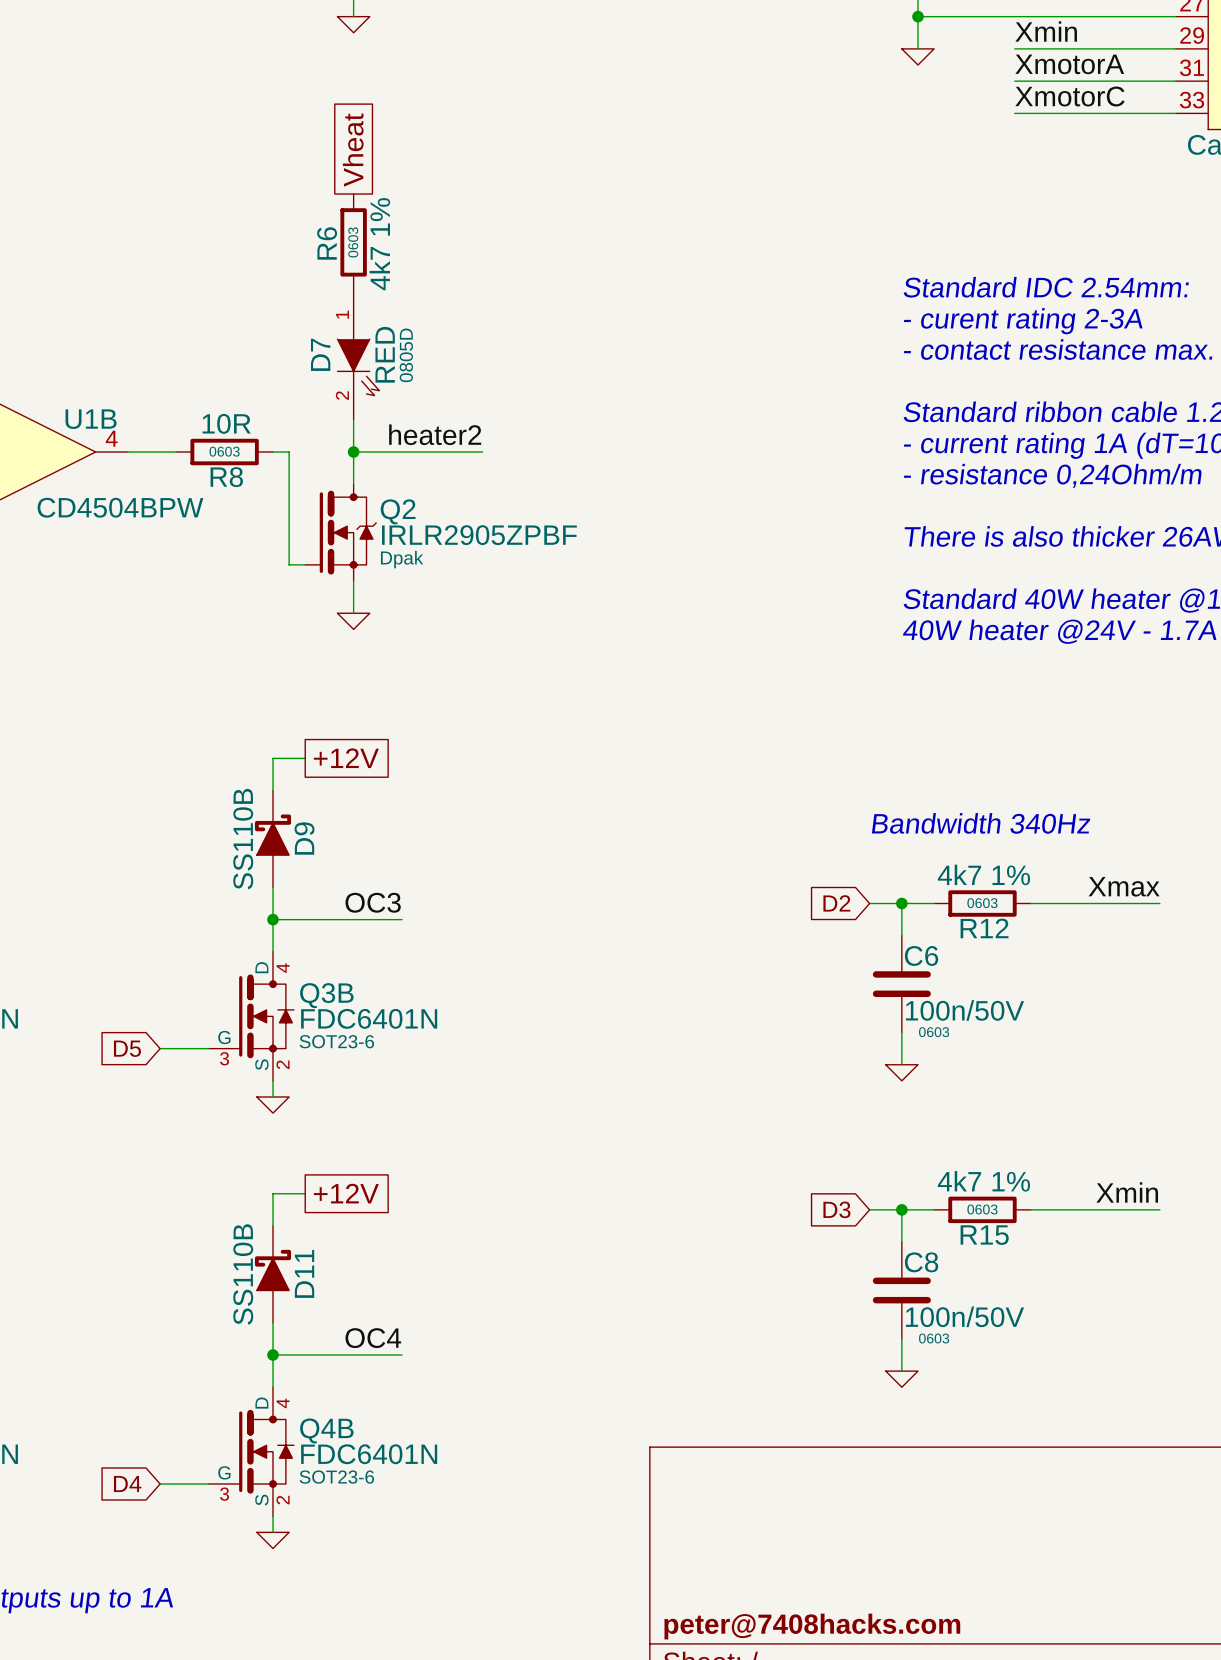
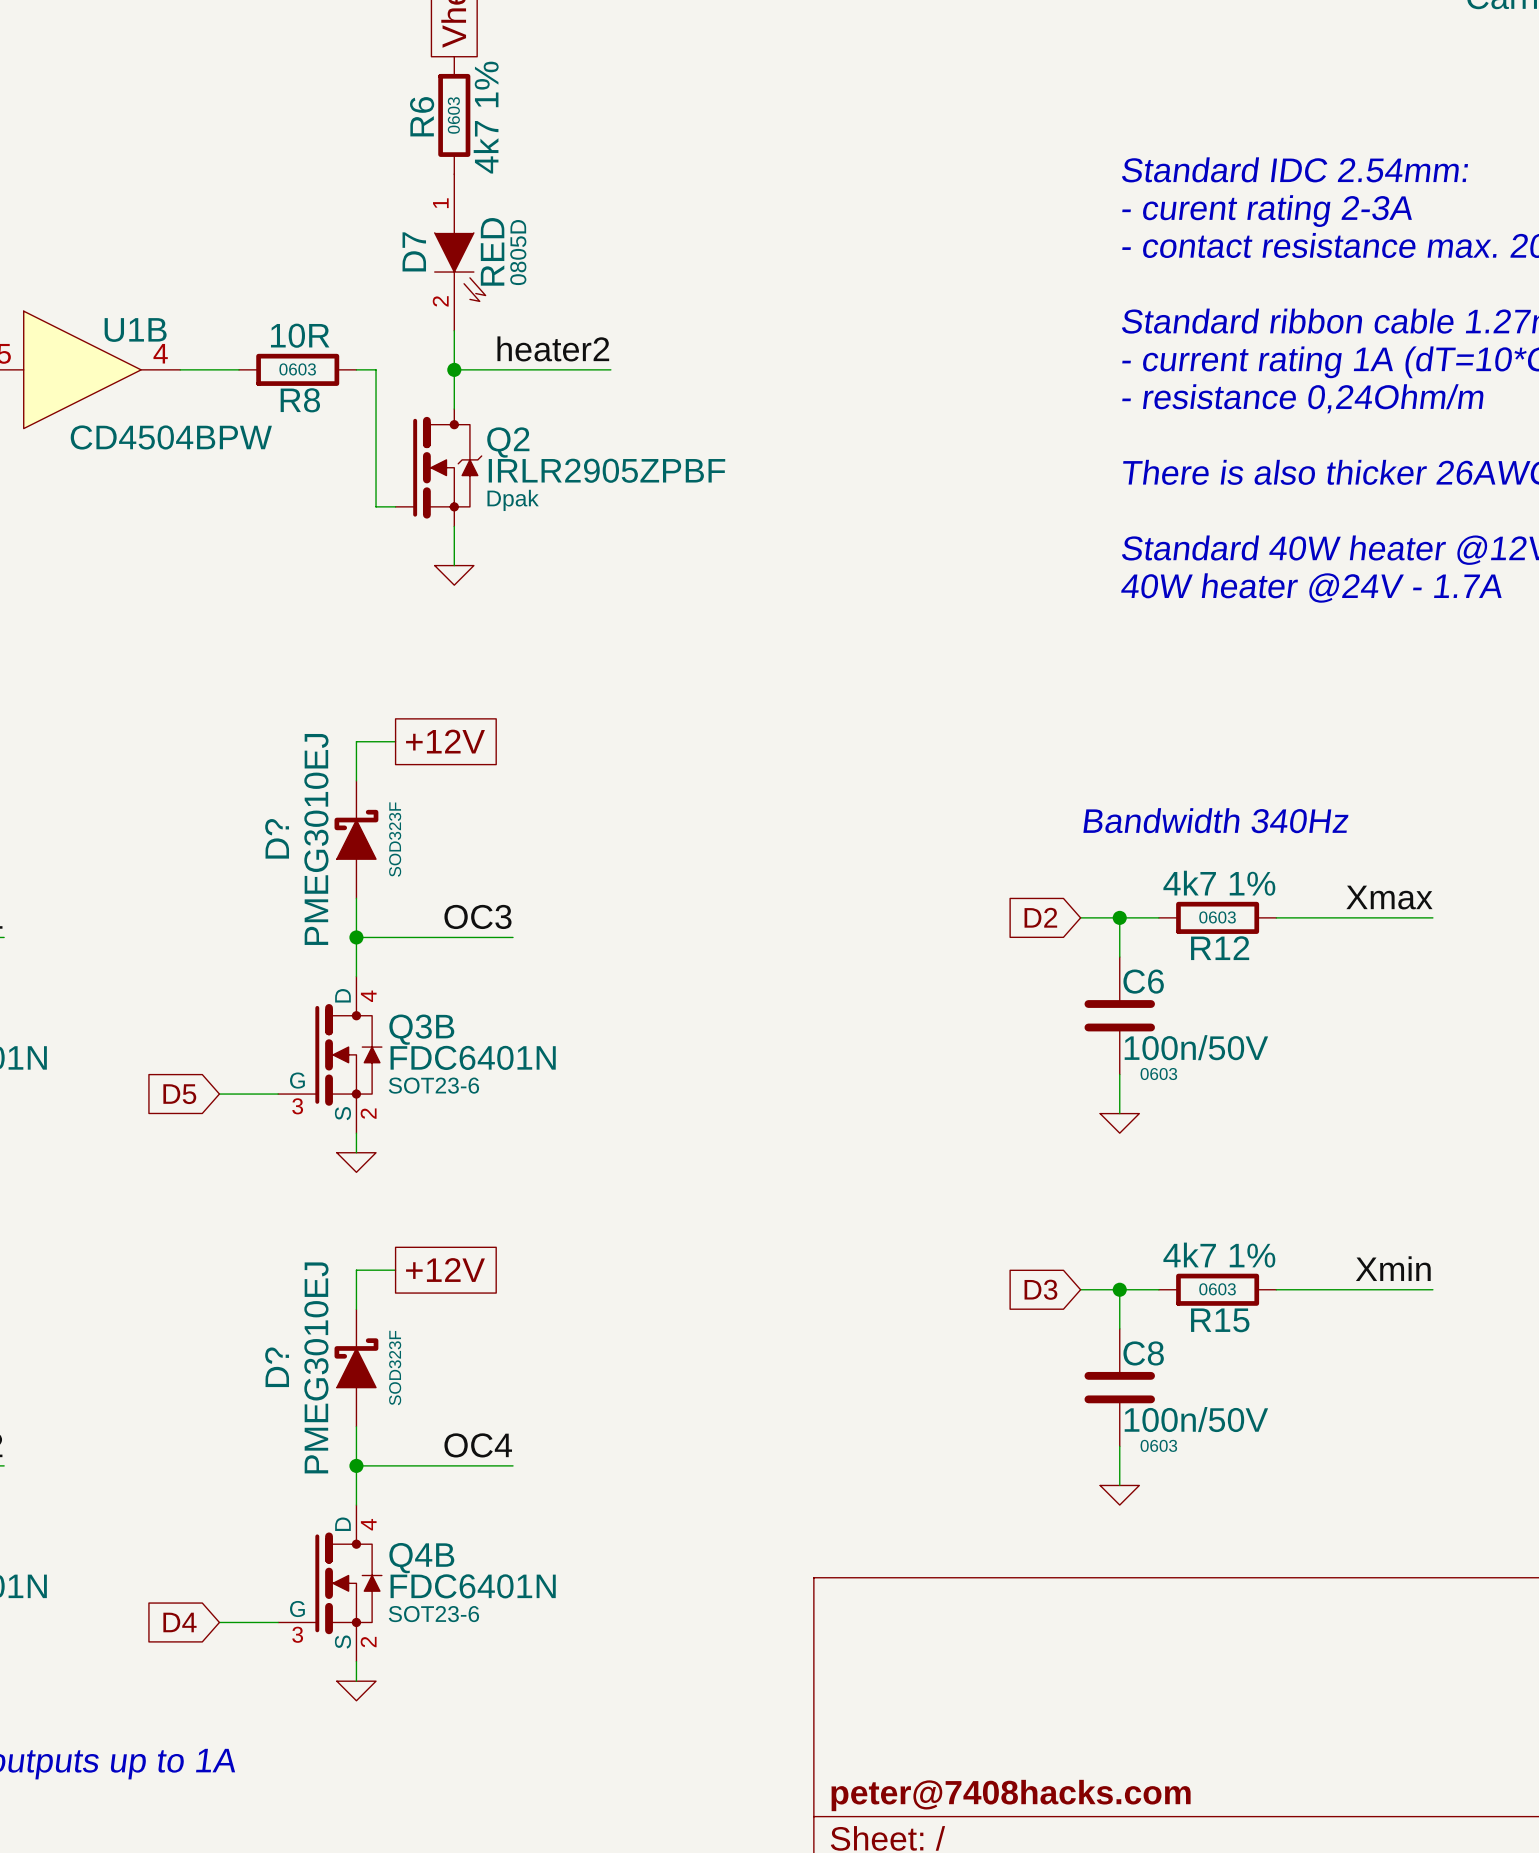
D9 text: none -> SOD323F (395, 839)
D9 name: D9 (304, 838) -> D? (277, 838)
D9 value: SS110B (243, 839) -> PMEG3010EJ (316, 839)
D11 name: D11 (304, 1273) -> D? (277, 1367)
D11 value: SS110B (243, 1274) -> PMEG3010EJ (316, 1367)
D11 text: none -> SOD323F (395, 1367)

